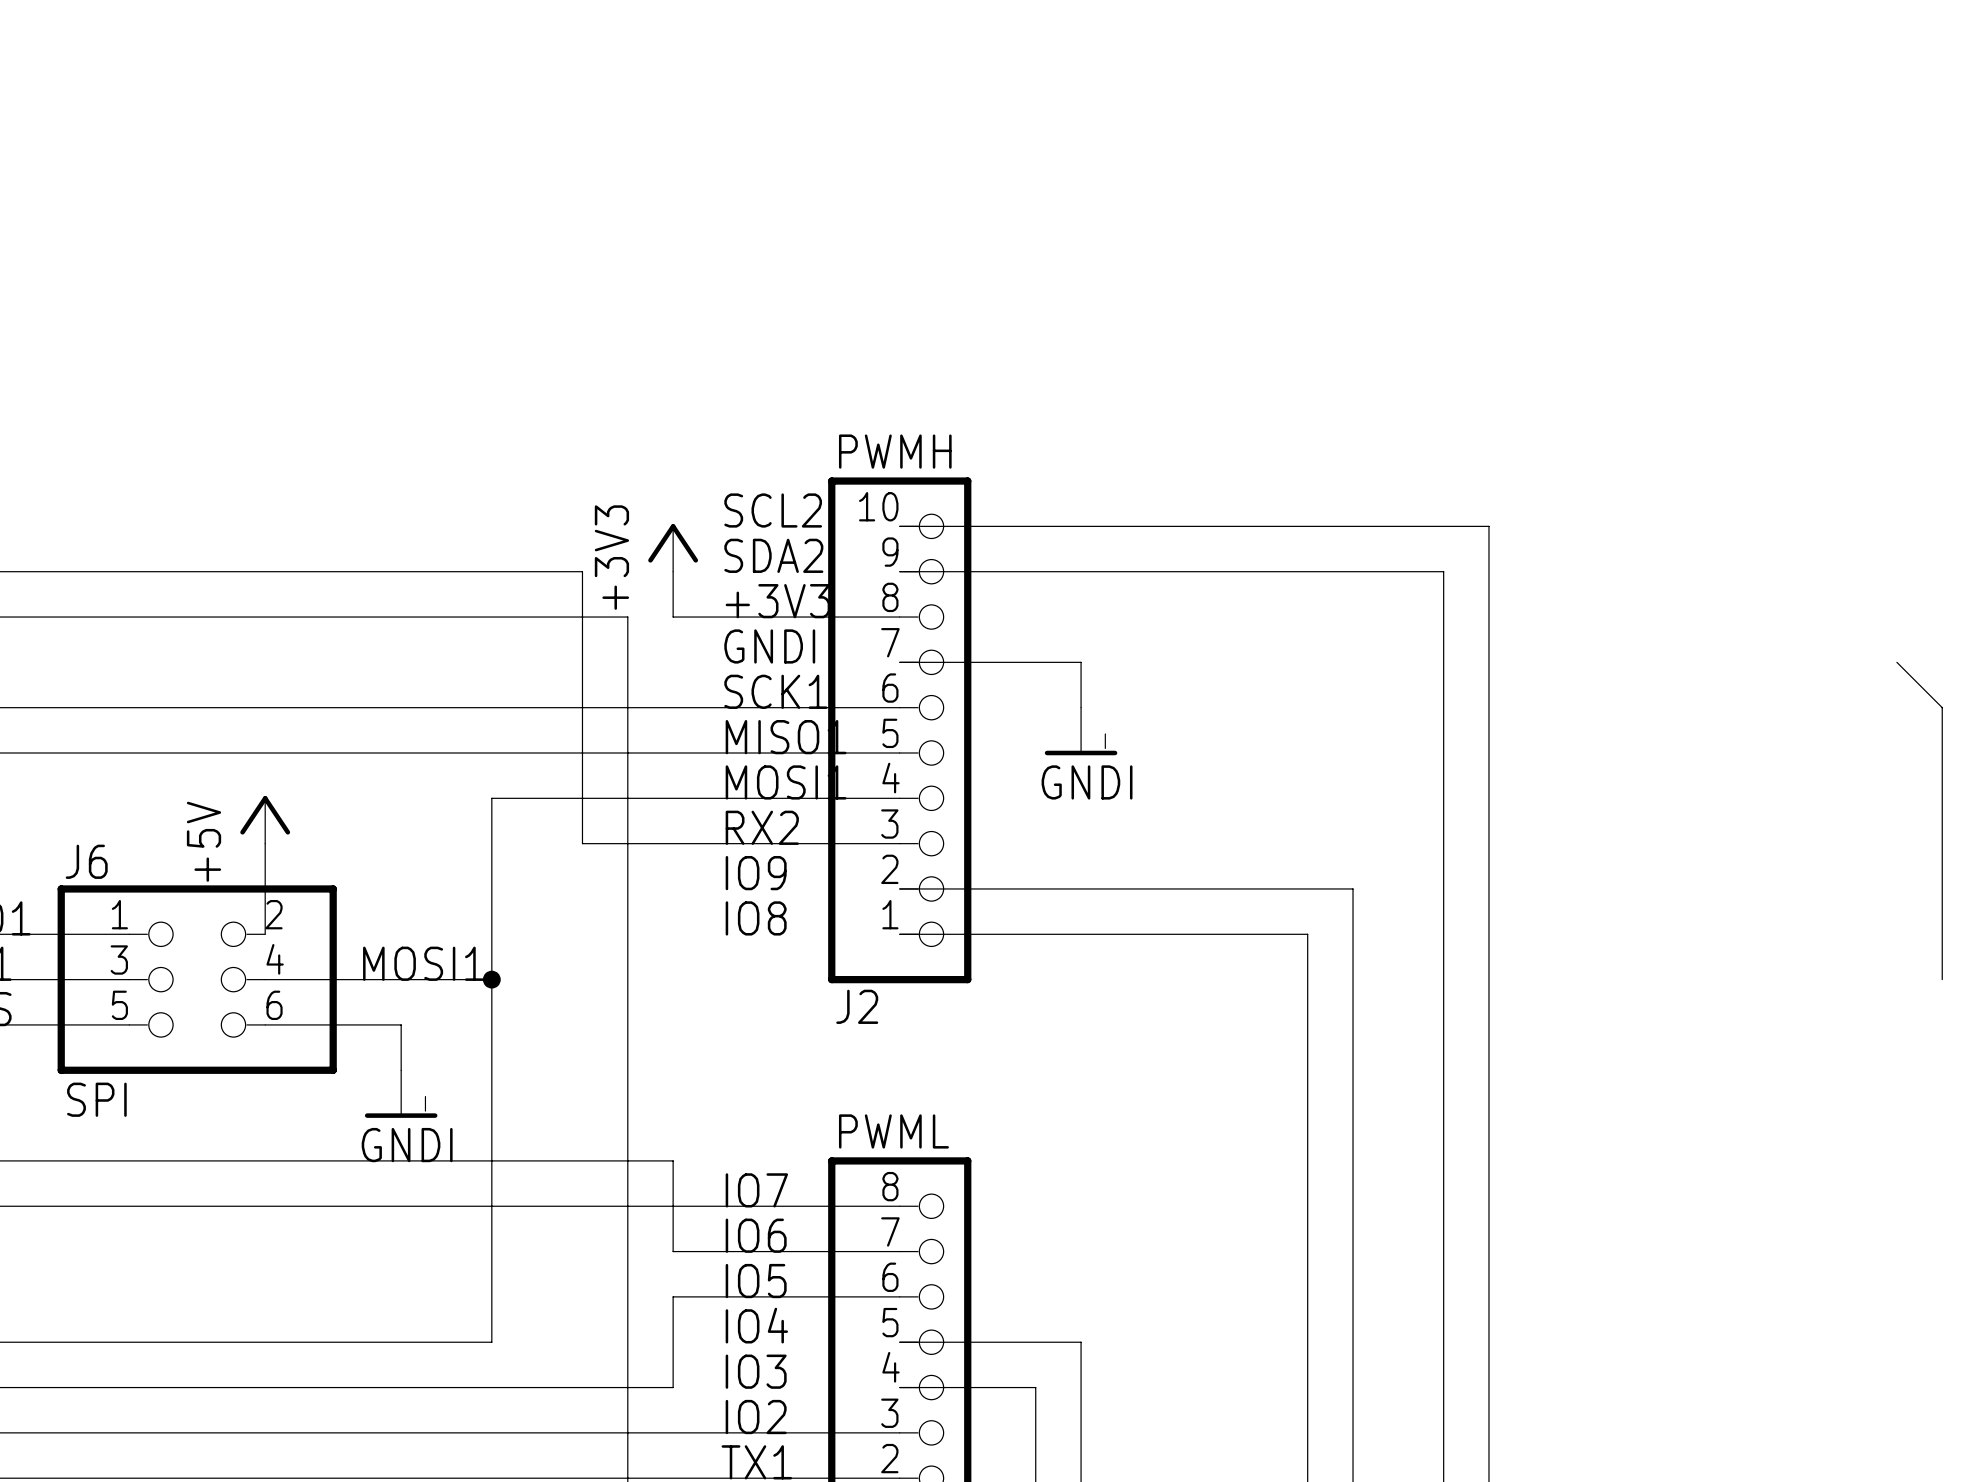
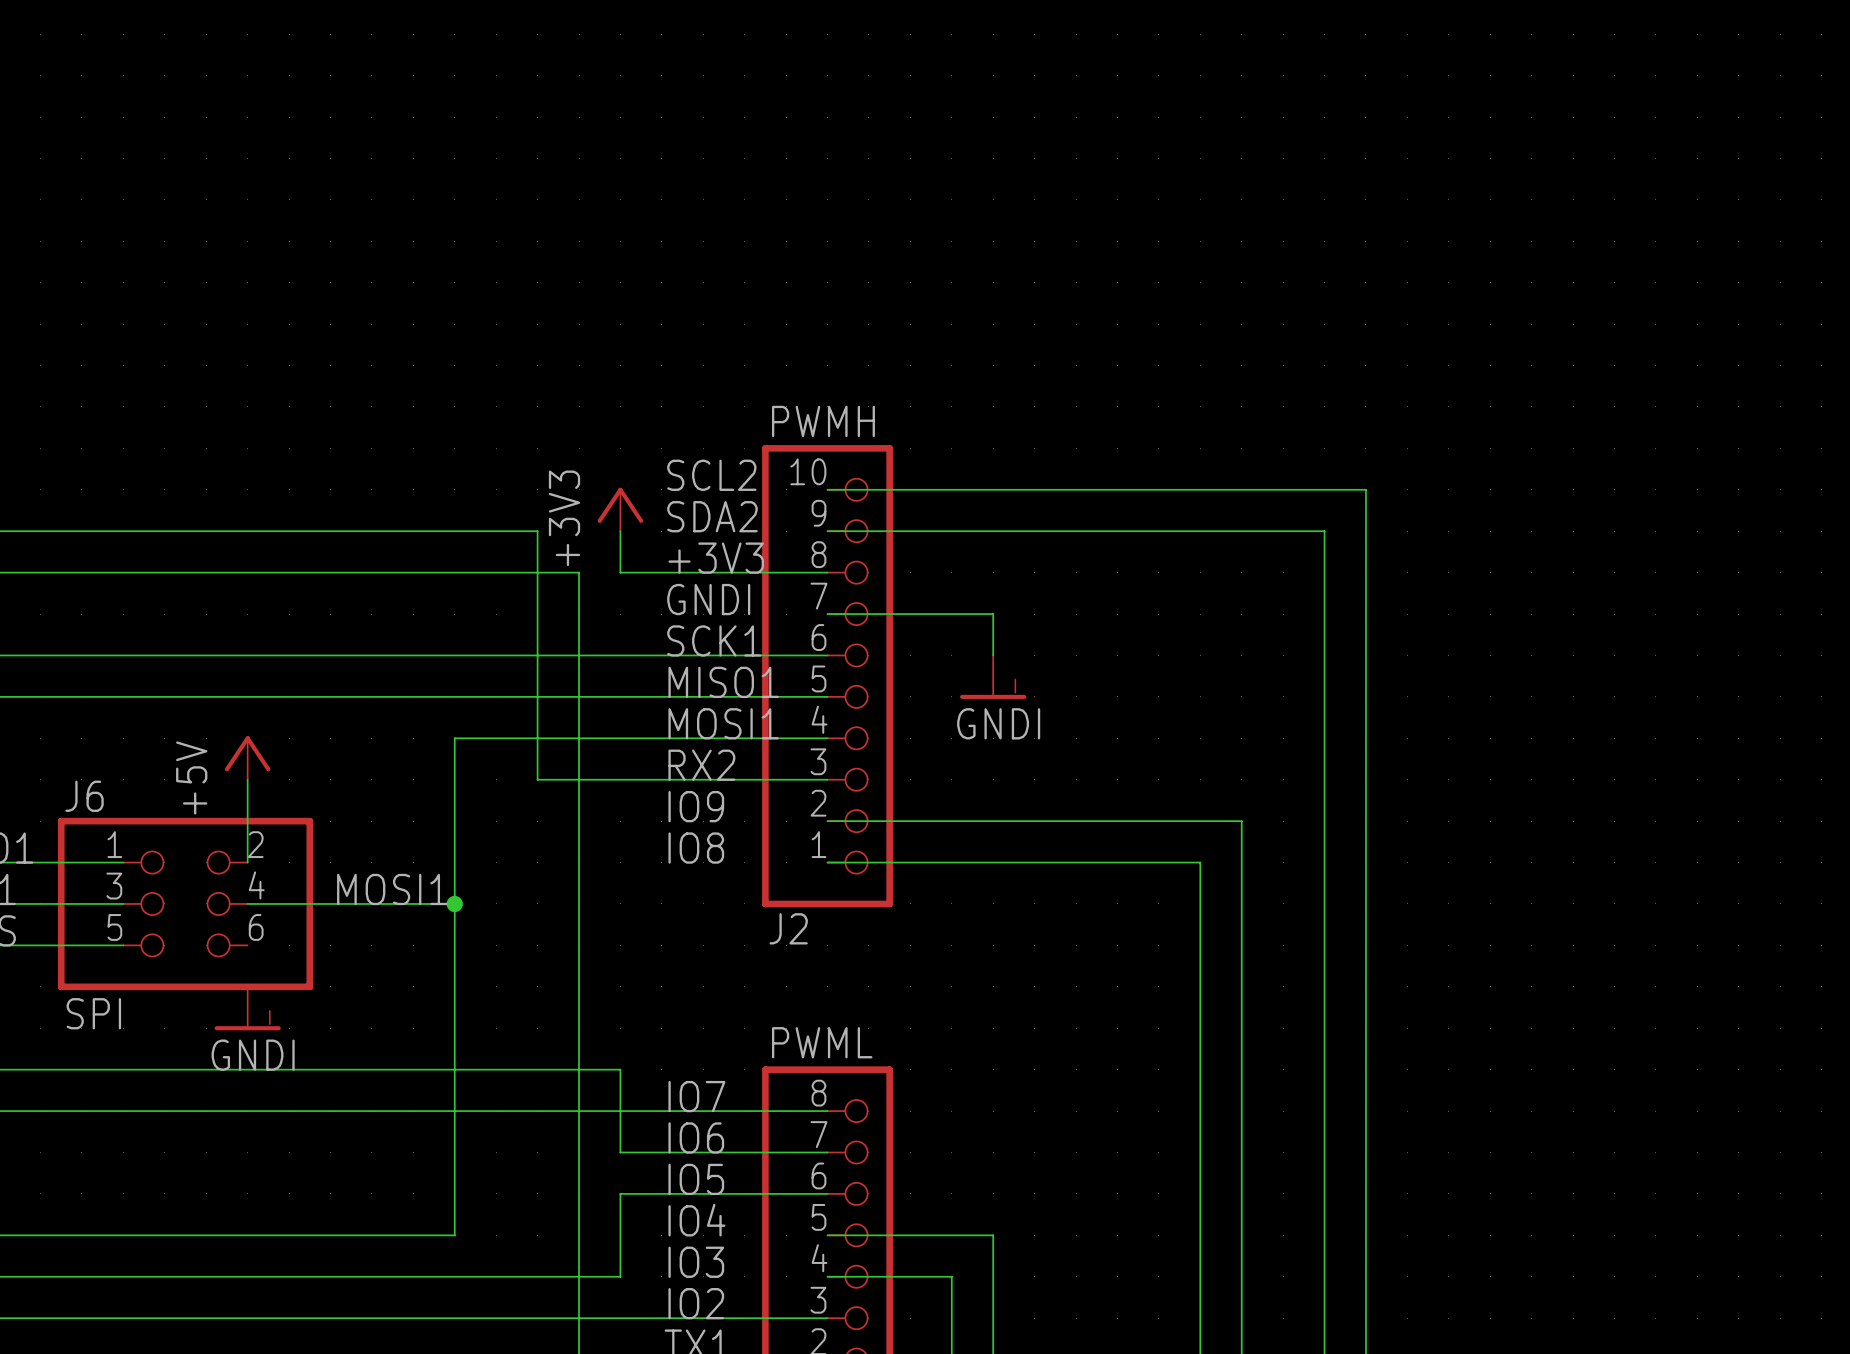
bus: (1896, 662) (1942, 707) (1942, 979) -> none
wire: (265, 1024) (401, 1024) (401, 1070) -> none
power symbol position: GNDI (401, 1094) -> GNDI (247, 1008)

